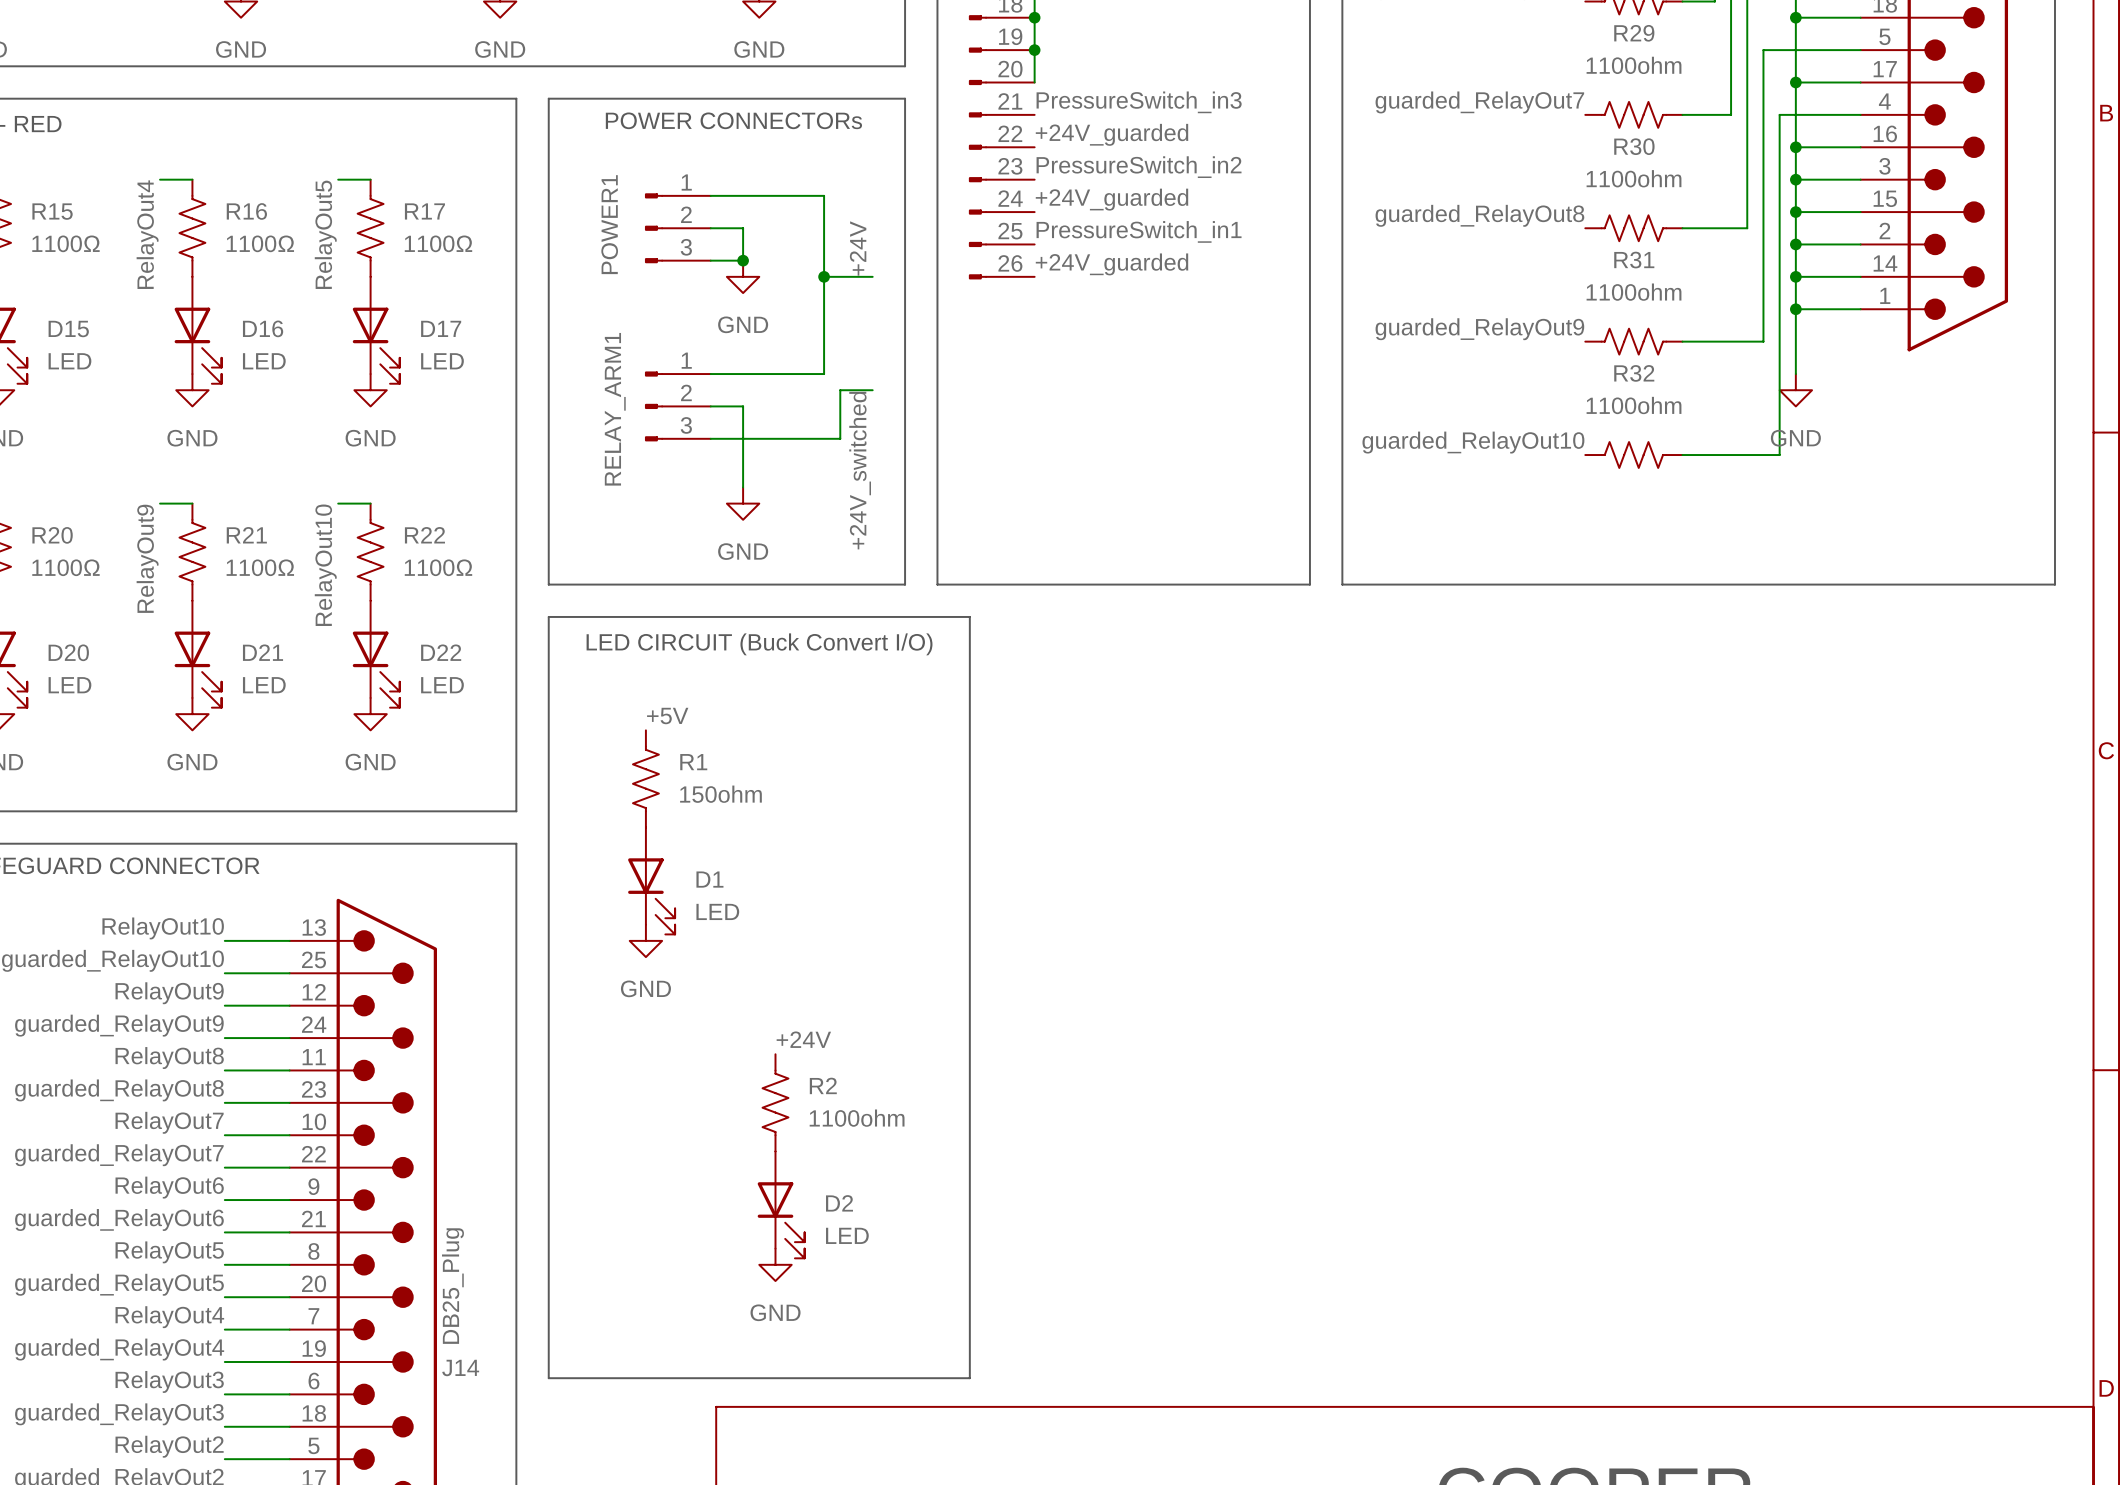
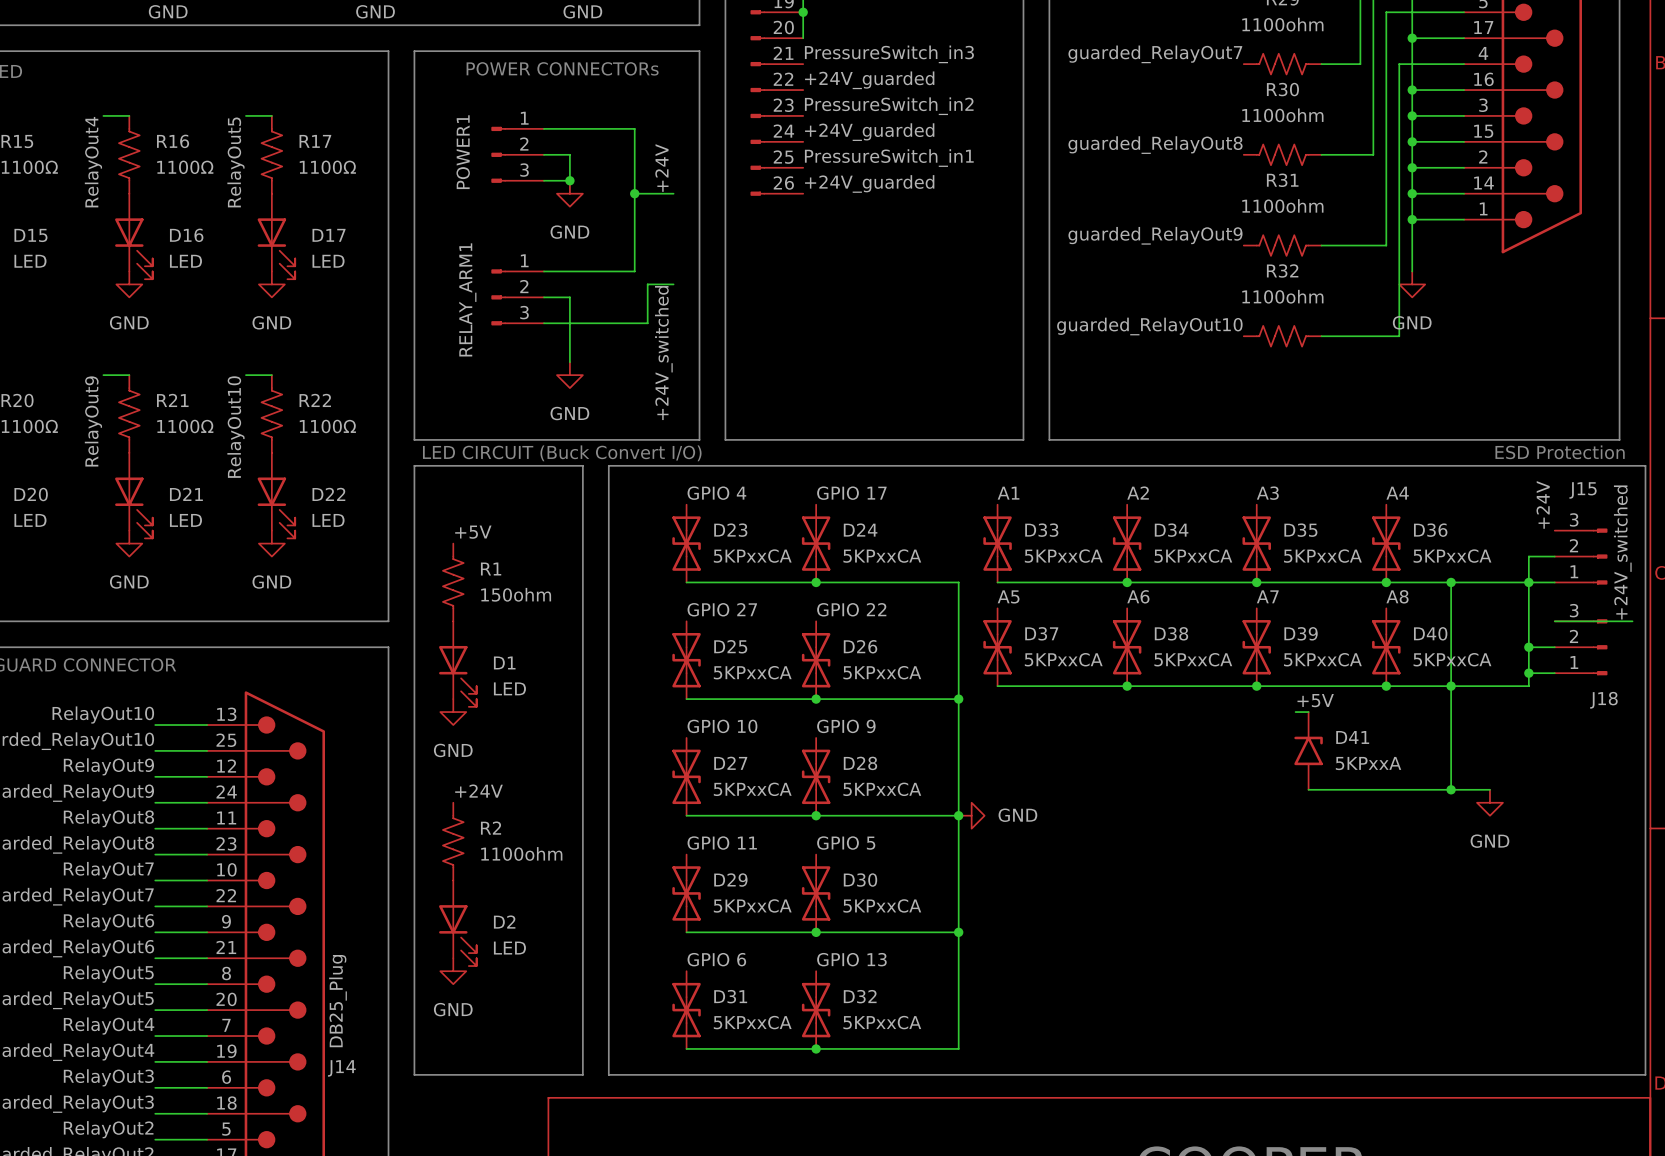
text: none -> ESD Protection (1560, 452)
line: (759, 616) (791, 616) -> (582, 465) (582, 1074)
line: (969, 616) (969, 1378) -> (751, 465) (1645, 465) (1645, 1074) (751, 1074)
text position: LED CIRCUIT (Buck Convert I/O) (759, 644) -> LED CIRCUIT (Buck Convert I/O) (562, 453)
label: none -> A2 (1138, 493)
label: none -> GPIO 4 (716, 493)
label: none -> GPIO 17 (851, 493)
label: none -> A1 (1008, 493)
label: none -> A3 (1267, 493)
label: none -> A4 (1397, 493)
label: none -> +24V (1543, 504)
D23: none -> 5KPxxCA (686, 543)
D24: none -> 5KPxxCA (816, 543)
D33: none -> 5KPxxCA (997, 543)
D34: none -> 5KPxxCA (1127, 543)
D35: none -> 5KPxxCA (1256, 543)
D36: none -> 5KPxxCA (1386, 543)
label position: +5V (667, 716) -> +5V (473, 532)
wire: none -> (1554, 556) (1528, 556) (1528, 686) (997, 686)
J15: none -> (1581, 556)
label: none -> +24V_switched (1622, 552)
wire: none -> (686, 582) (958, 582) (958, 1048) (686, 1048)
junction: none -> (816, 582)
wire: none -> (997, 582) (1554, 582)
junction: none -> (1127, 582)
junction: none -> (1256, 582)
junction: none -> (1386, 582)
wire: none -> (1451, 582) (1451, 789)
junction: none -> (1451, 582)
junction: none -> (1528, 582)
R1 position: (645, 778) -> (453, 582)
label: none -> A5 (1008, 596)
label: none -> A6 (1138, 596)
label: none -> A7 (1267, 596)
label: none -> A8 (1397, 596)
label: none -> GPIO 27 (722, 609)
label: none -> GPIO 22 (851, 609)
wire: none -> (1554, 621) (1632, 621)
D37: none -> 5KPxxCA (997, 647)
D38: none -> 5KPxxCA (1127, 647)
D39: none -> 5KPxxCA (1256, 647)
D40: none -> 5KPxxCA (1386, 647)
wire: none -> (1528, 647) (1554, 647)
junction: none -> (1528, 647)
J18: none -> (1581, 647)
D25: none -> 5KPxxCA (686, 660)
D26: none -> 5KPxxCA (816, 660)
wire: none -> (1528, 673) (1554, 673)
junction: none -> (1528, 673)
D1 position: (651, 880) -> (457, 664)
junction: none -> (1127, 686)
junction: none -> (1256, 686)
junction: none -> (1386, 686)
junction: none -> (1451, 686)
wire: none -> (686, 699) (958, 699)
junction: none -> (816, 699)
junction: none -> (958, 699)
label: none -> +5V (1315, 700)
wire: none -> (1295, 712) (1308, 712)
power symbol position: GND (645, 940) -> GND (453, 712)
label: none -> GPIO 10 (722, 726)
label: none -> GPIO 9 (846, 726)
D41: none -> 5KPxxA (1308, 750)
D27: none -> 5KPxxCA (686, 776)
D28: none -> 5KPxxCA (816, 776)
wire: none -> (1308, 789) (1489, 789)
junction: none -> (1451, 789)
power symbol: none -> GND (1489, 802)
label position: +24V (803, 1039) -> +24V (479, 791)
wire: none -> (686, 815) (958, 815)
junction: none -> (816, 815)
junction: none -> (958, 815)
power symbol: none -> GND (971, 815)
label: none -> GPIO 11 (722, 843)
label: none -> GPIO 5 (846, 843)
R2 position: (775, 1102) -> (453, 841)
D29: none -> 5KPxxCA (686, 893)
D30: none -> 5KPxxCA (816, 893)
wire: none -> (686, 932) (958, 932)
junction: none -> (816, 932)
junction: none -> (958, 932)
D2 position: (781, 1204) -> (457, 923)
label: none -> GPIO 6 (716, 959)
label: none -> GPIO 13 (851, 959)
power symbol: none -> GND (453, 971)
power symbol: GND (775, 1264) -> none
D31: none -> 5KPxxCA (686, 1010)
D32: none -> 5KPxxCA (816, 1010)
junction: none -> (816, 1048)
line: (759, 1378) (791, 1378) -> (608, 465) (608, 1074)

